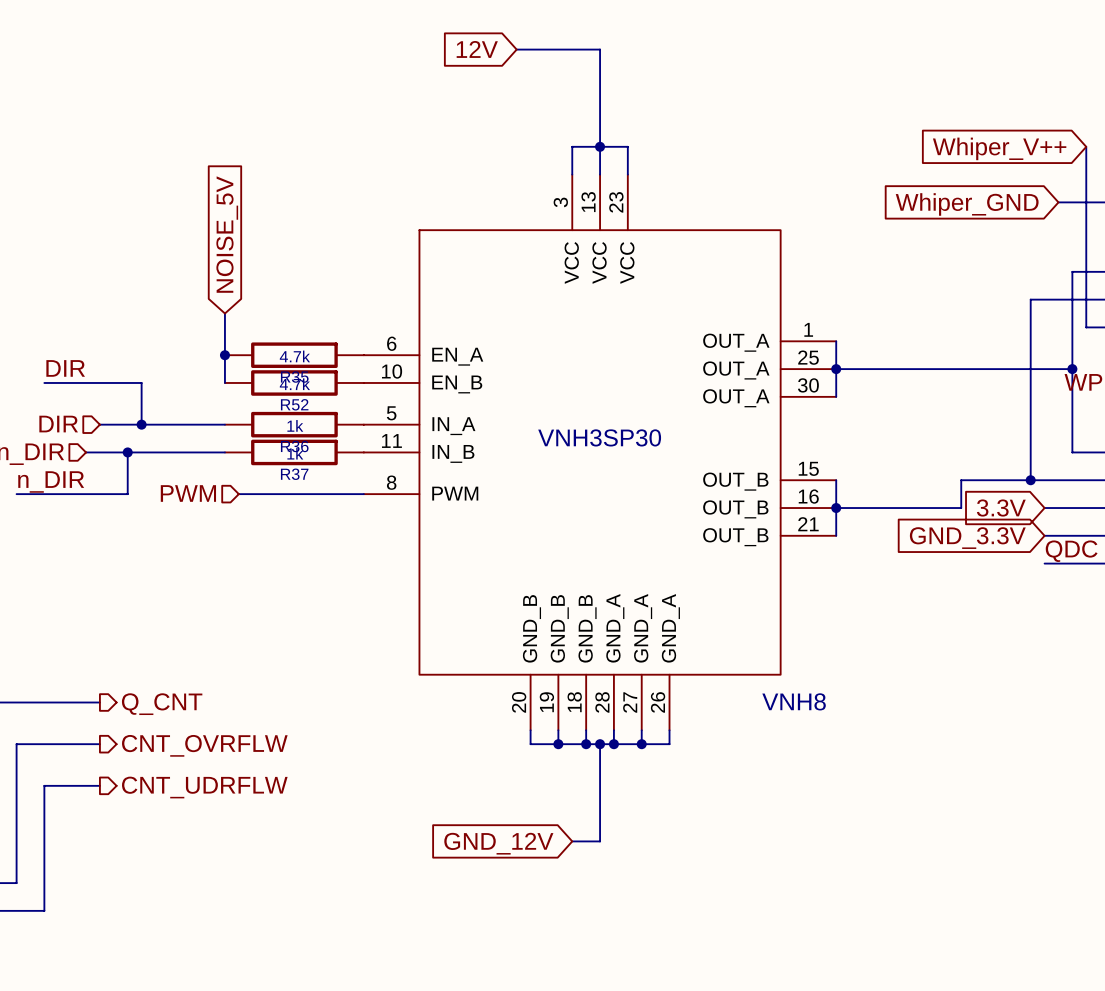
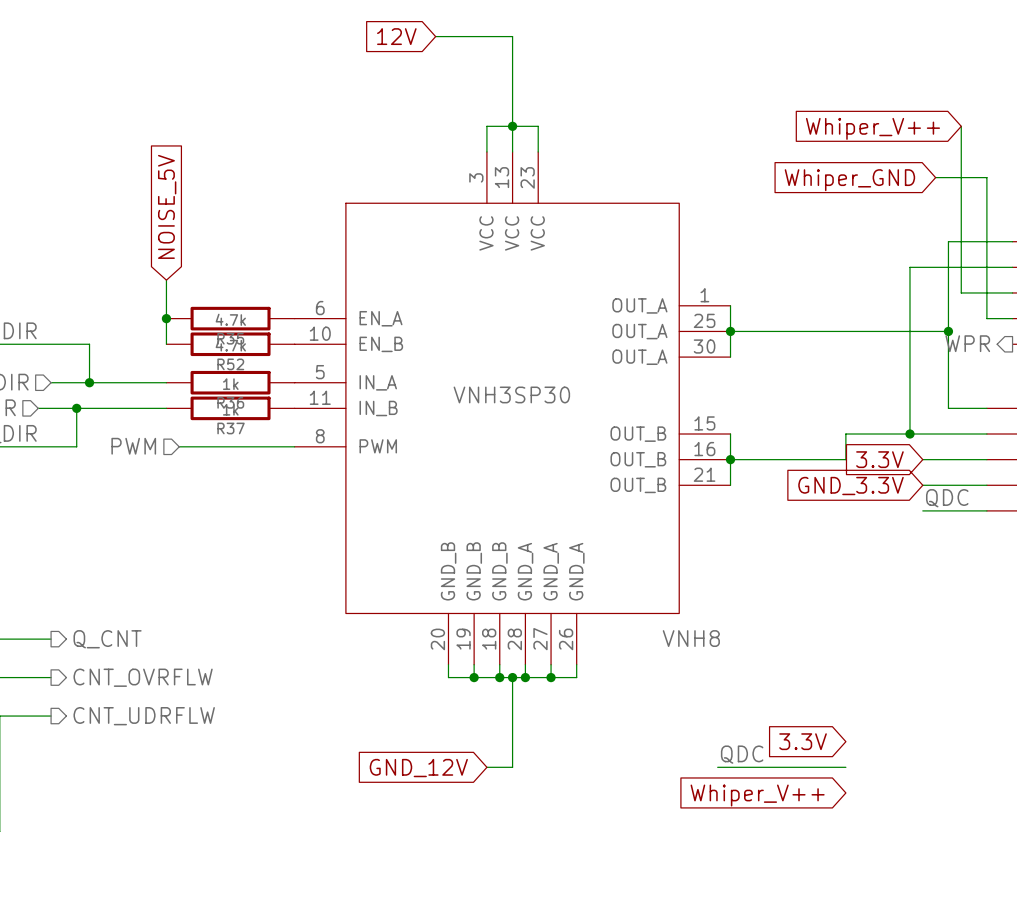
global label: none -> 3.3V (803, 741)
label: none -> QDC (742, 754)
wire: none -> (717, 767) (845, 767)
global label: none -> Whiper_V++ (757, 795)

